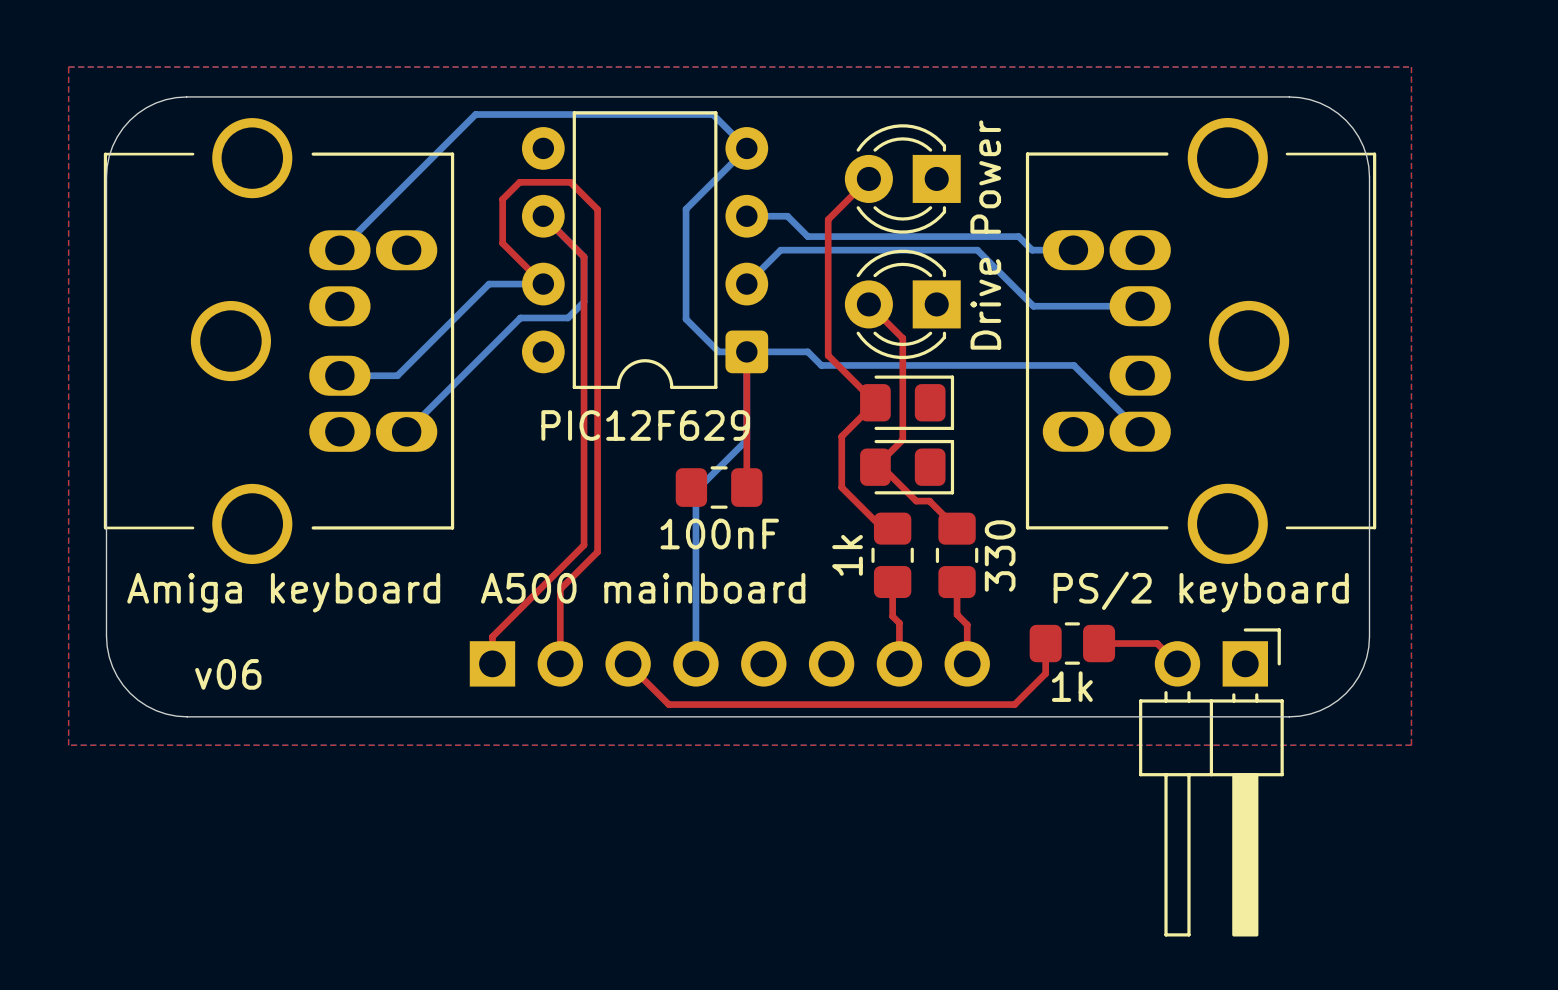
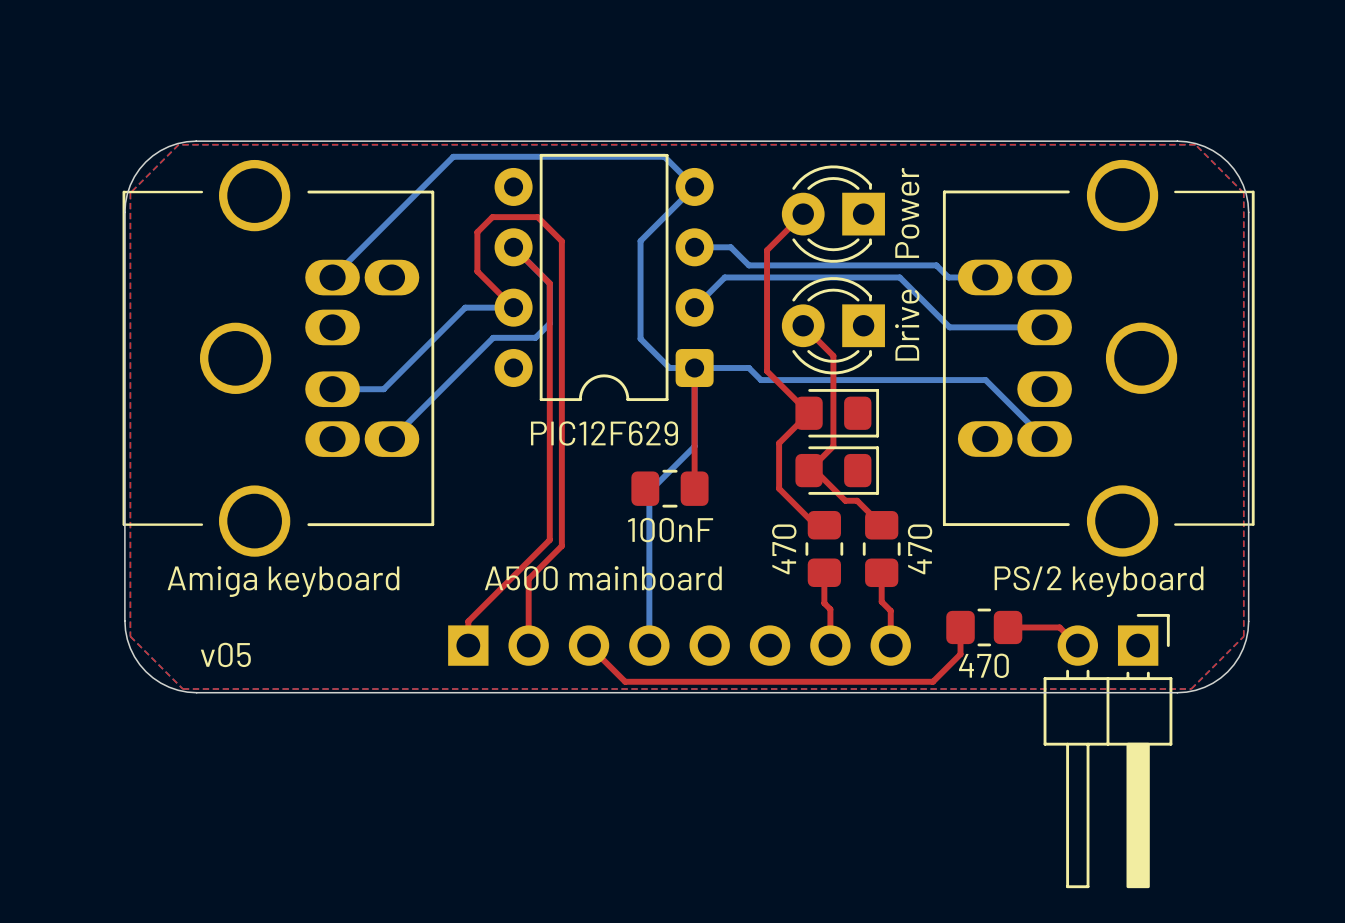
top zone outline: (68, 67) (1411, 67) (1411, 745) (68, 745) (68, 67) -> (178, 144) (130, 192) (130, 636) (182, 689) (1191, 689) (1243, 636) (1243, 192) (1195, 144) (178, 144)
part value: 1k (847, 555) -> 470 (784, 549)
part value: 330 (1000, 555) -> 470 (920, 549)
text: v06 (228, 674) -> v05 (225, 654)
part value: 1k (1072, 686) -> 470 (983, 665)

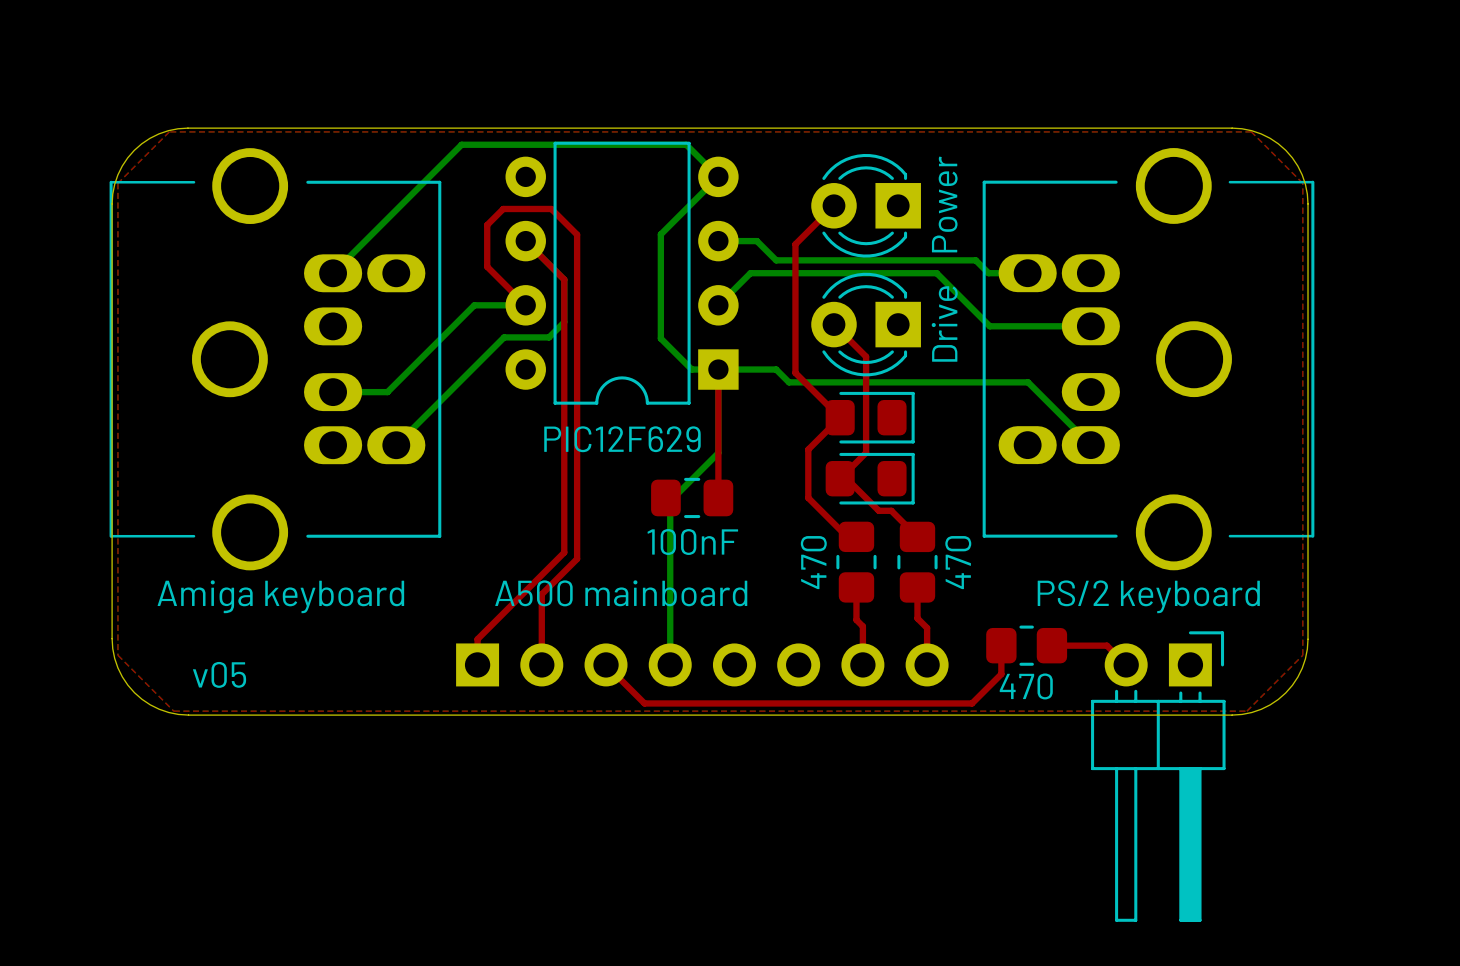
part footprint: [494, 153, 714, 402] -> [505, 141, 739, 405]
part footprint: [1043, 613, 1173, 889] -> [1091, 631, 1226, 922]

